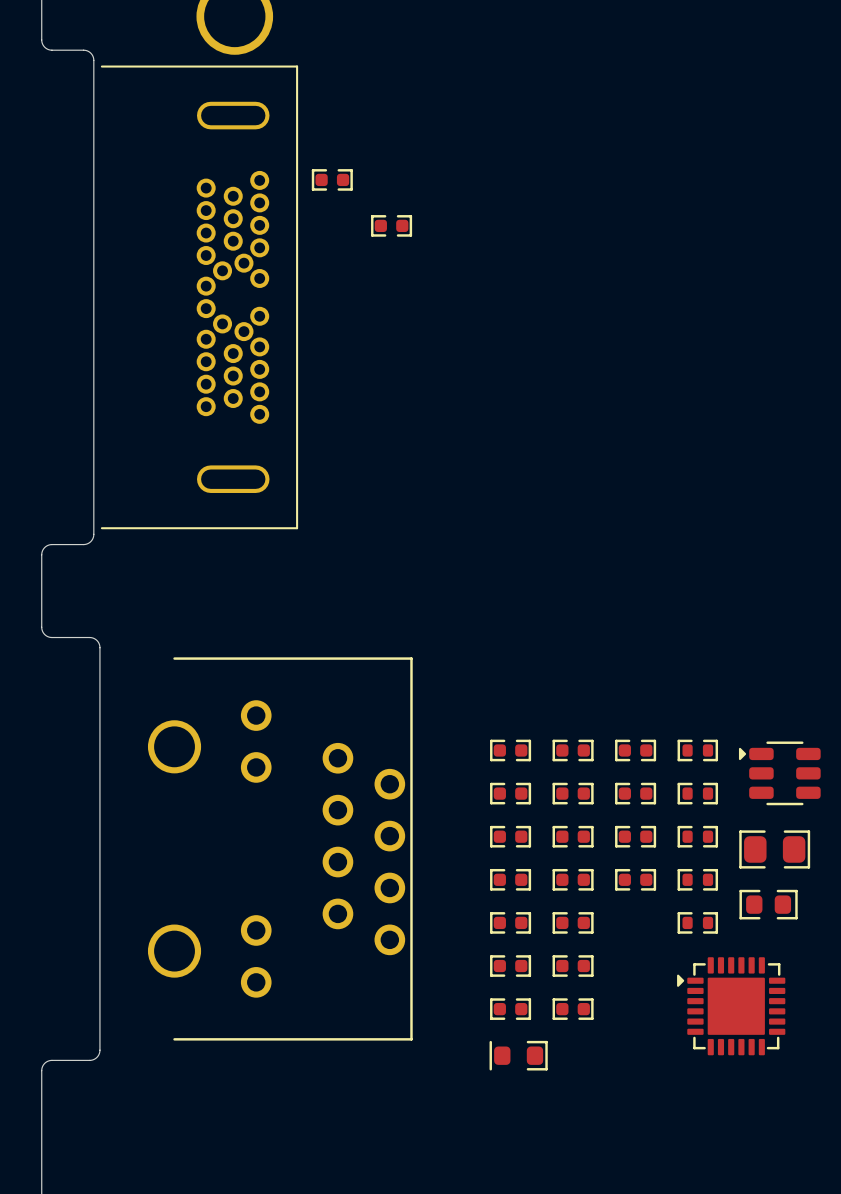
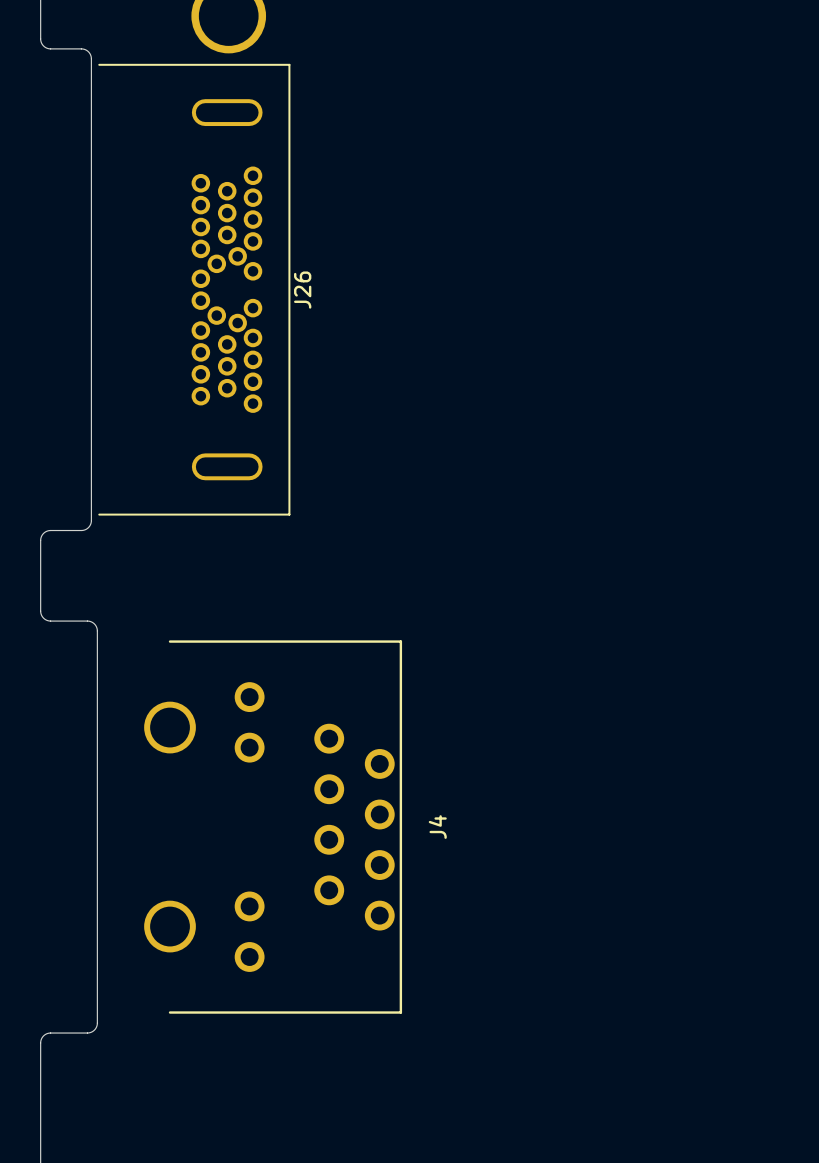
part: (332, 179) -> none
part: (391, 225) -> none
J26 name: none -> J26 (302, 290)
part: (510, 750) -> none
part: (573, 750) -> none
part: (635, 750) -> none
part: (697, 750) -> none
part: (779, 773) -> none
part: (510, 793) -> none
part: (573, 793) -> none
part: (635, 793) -> none
part: (697, 793) -> none
part: (510, 836) -> none
part: (573, 836) -> none
part: (635, 836) -> none
part: (697, 836) -> none
J4 name: none -> J4 (437, 827)
part: (774, 849) -> none
part: (510, 879) -> none
part: (573, 879) -> none
part: (635, 879) -> none
part: (697, 879) -> none
part: (768, 904) -> none
part: (510, 922) -> none
part: (573, 922) -> none
part: (697, 922) -> none
part: (510, 966) -> none
part: (573, 966) -> none
part: (731, 1006) -> none
part: (510, 1009) -> none
part: (573, 1009) -> none
part: (518, 1055) -> none

